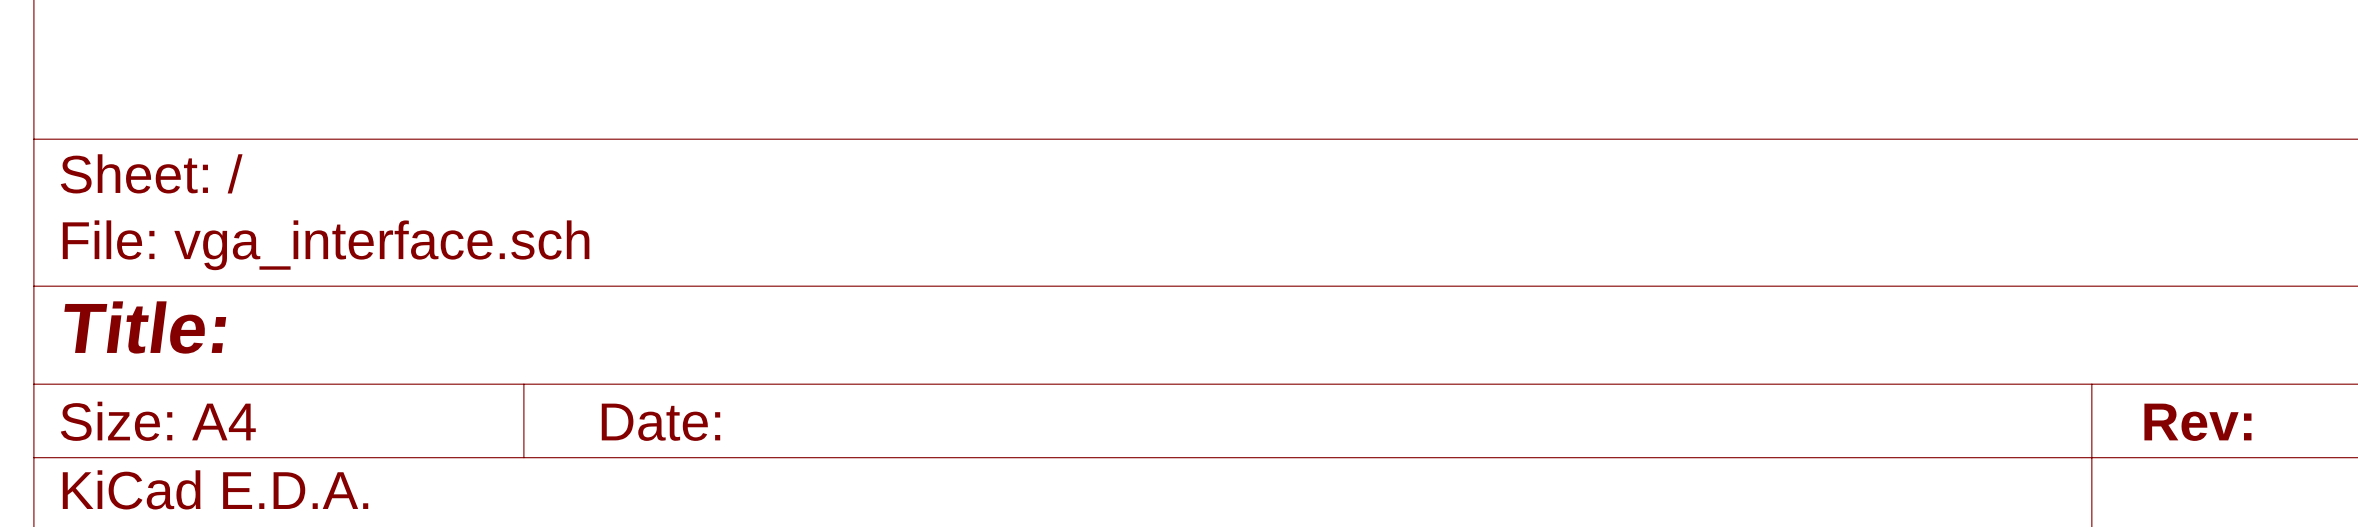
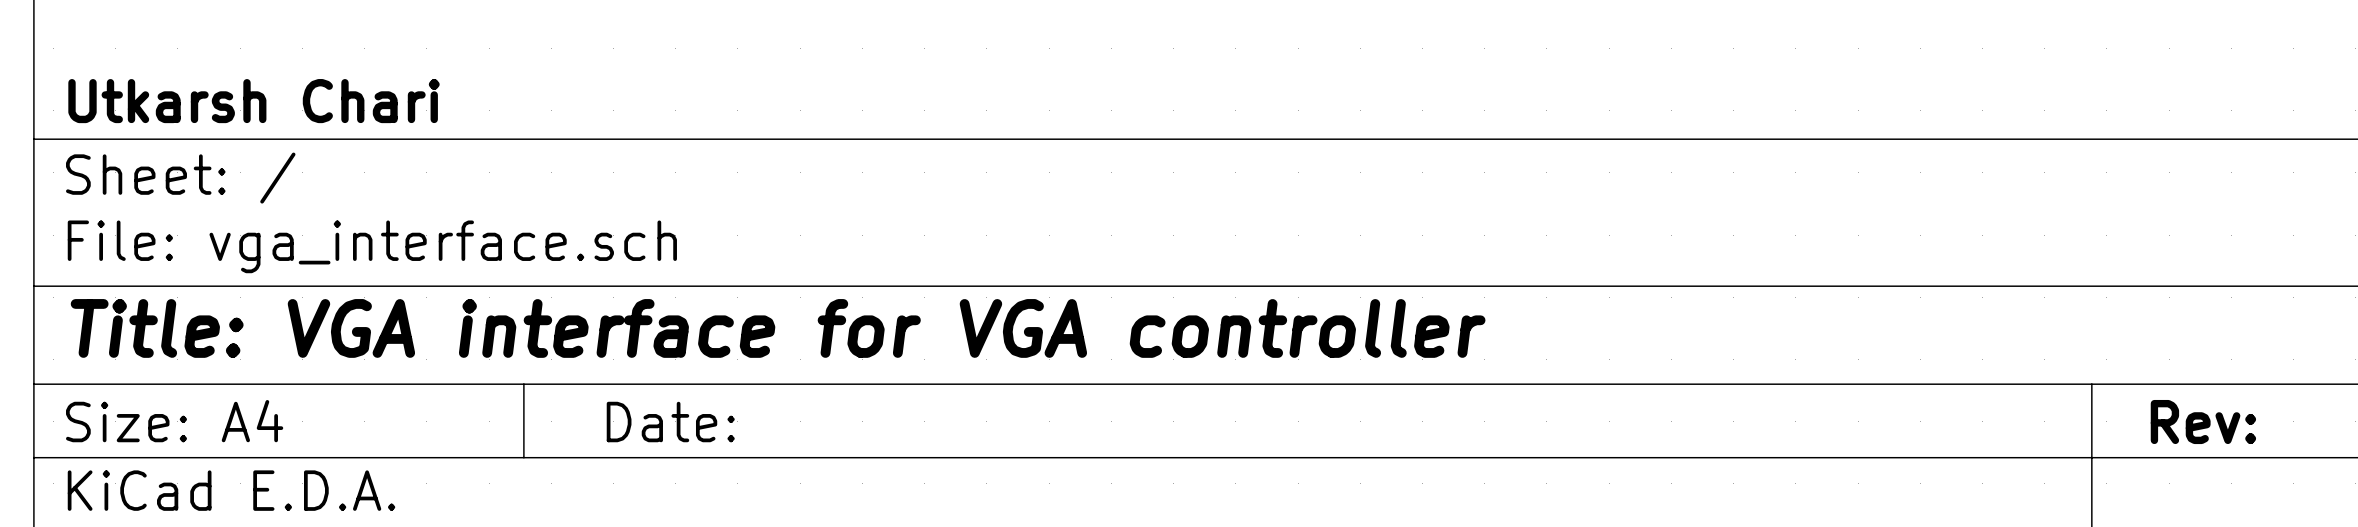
title block: none -> Utkarsh Chari (253, 101)
title block: Title: (145, 327) -> Title: VGA interface for VGA controller (778, 328)

